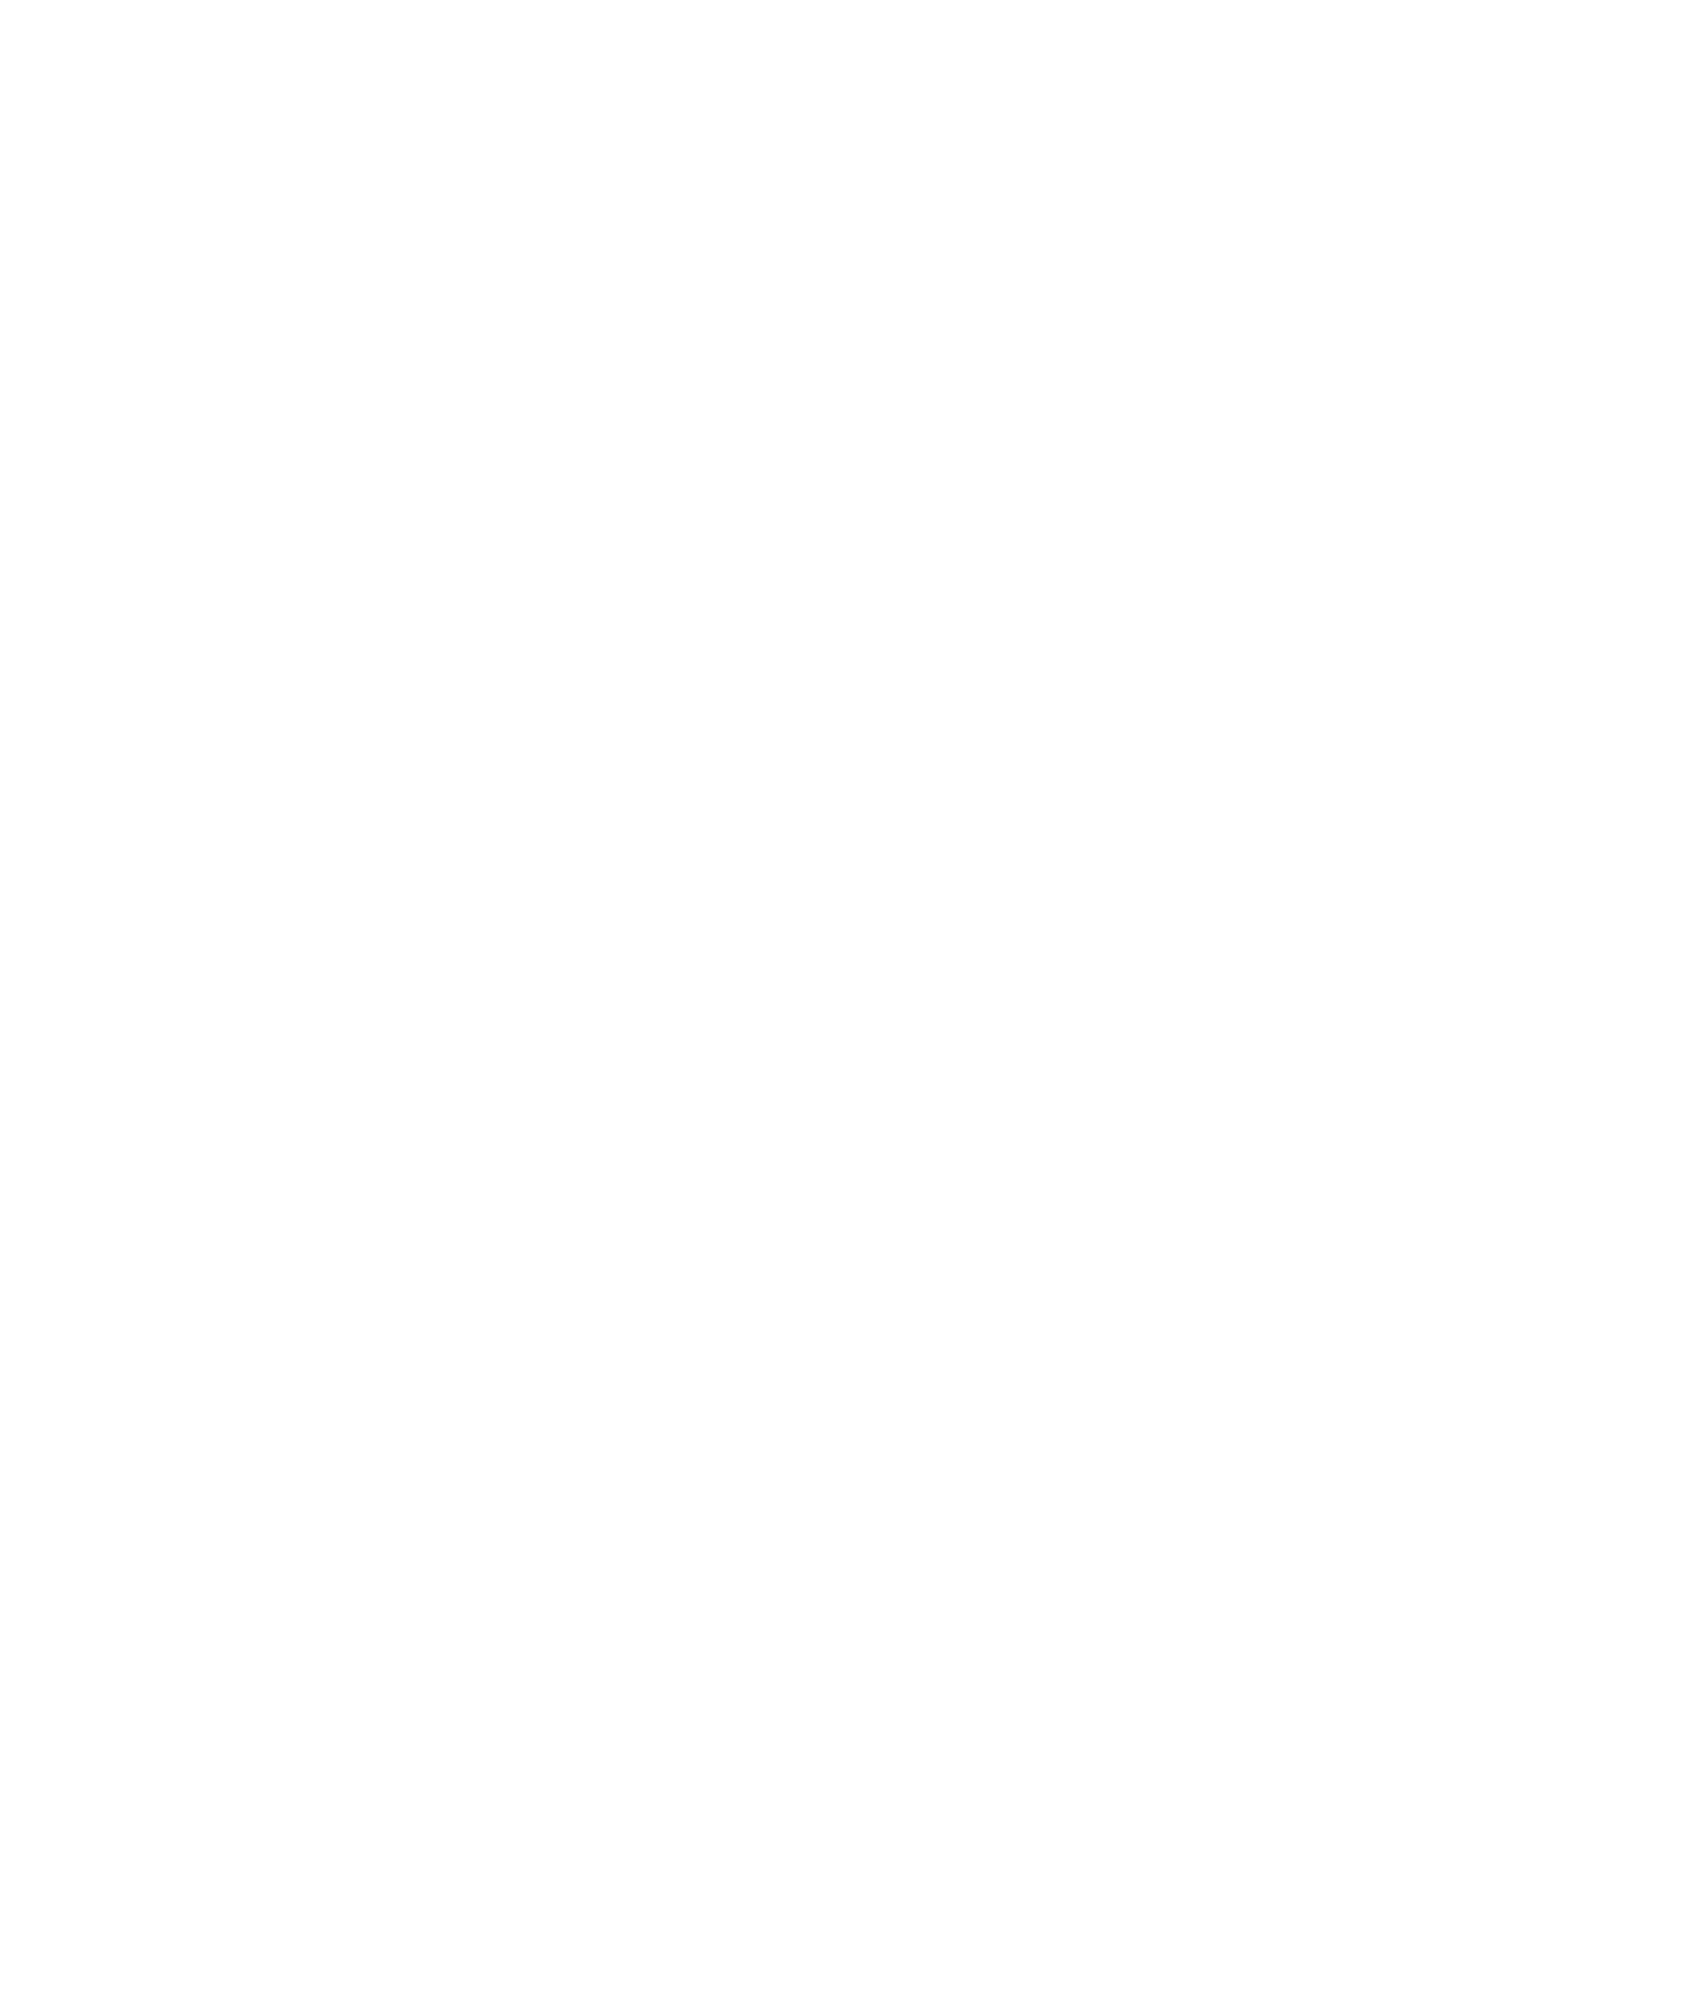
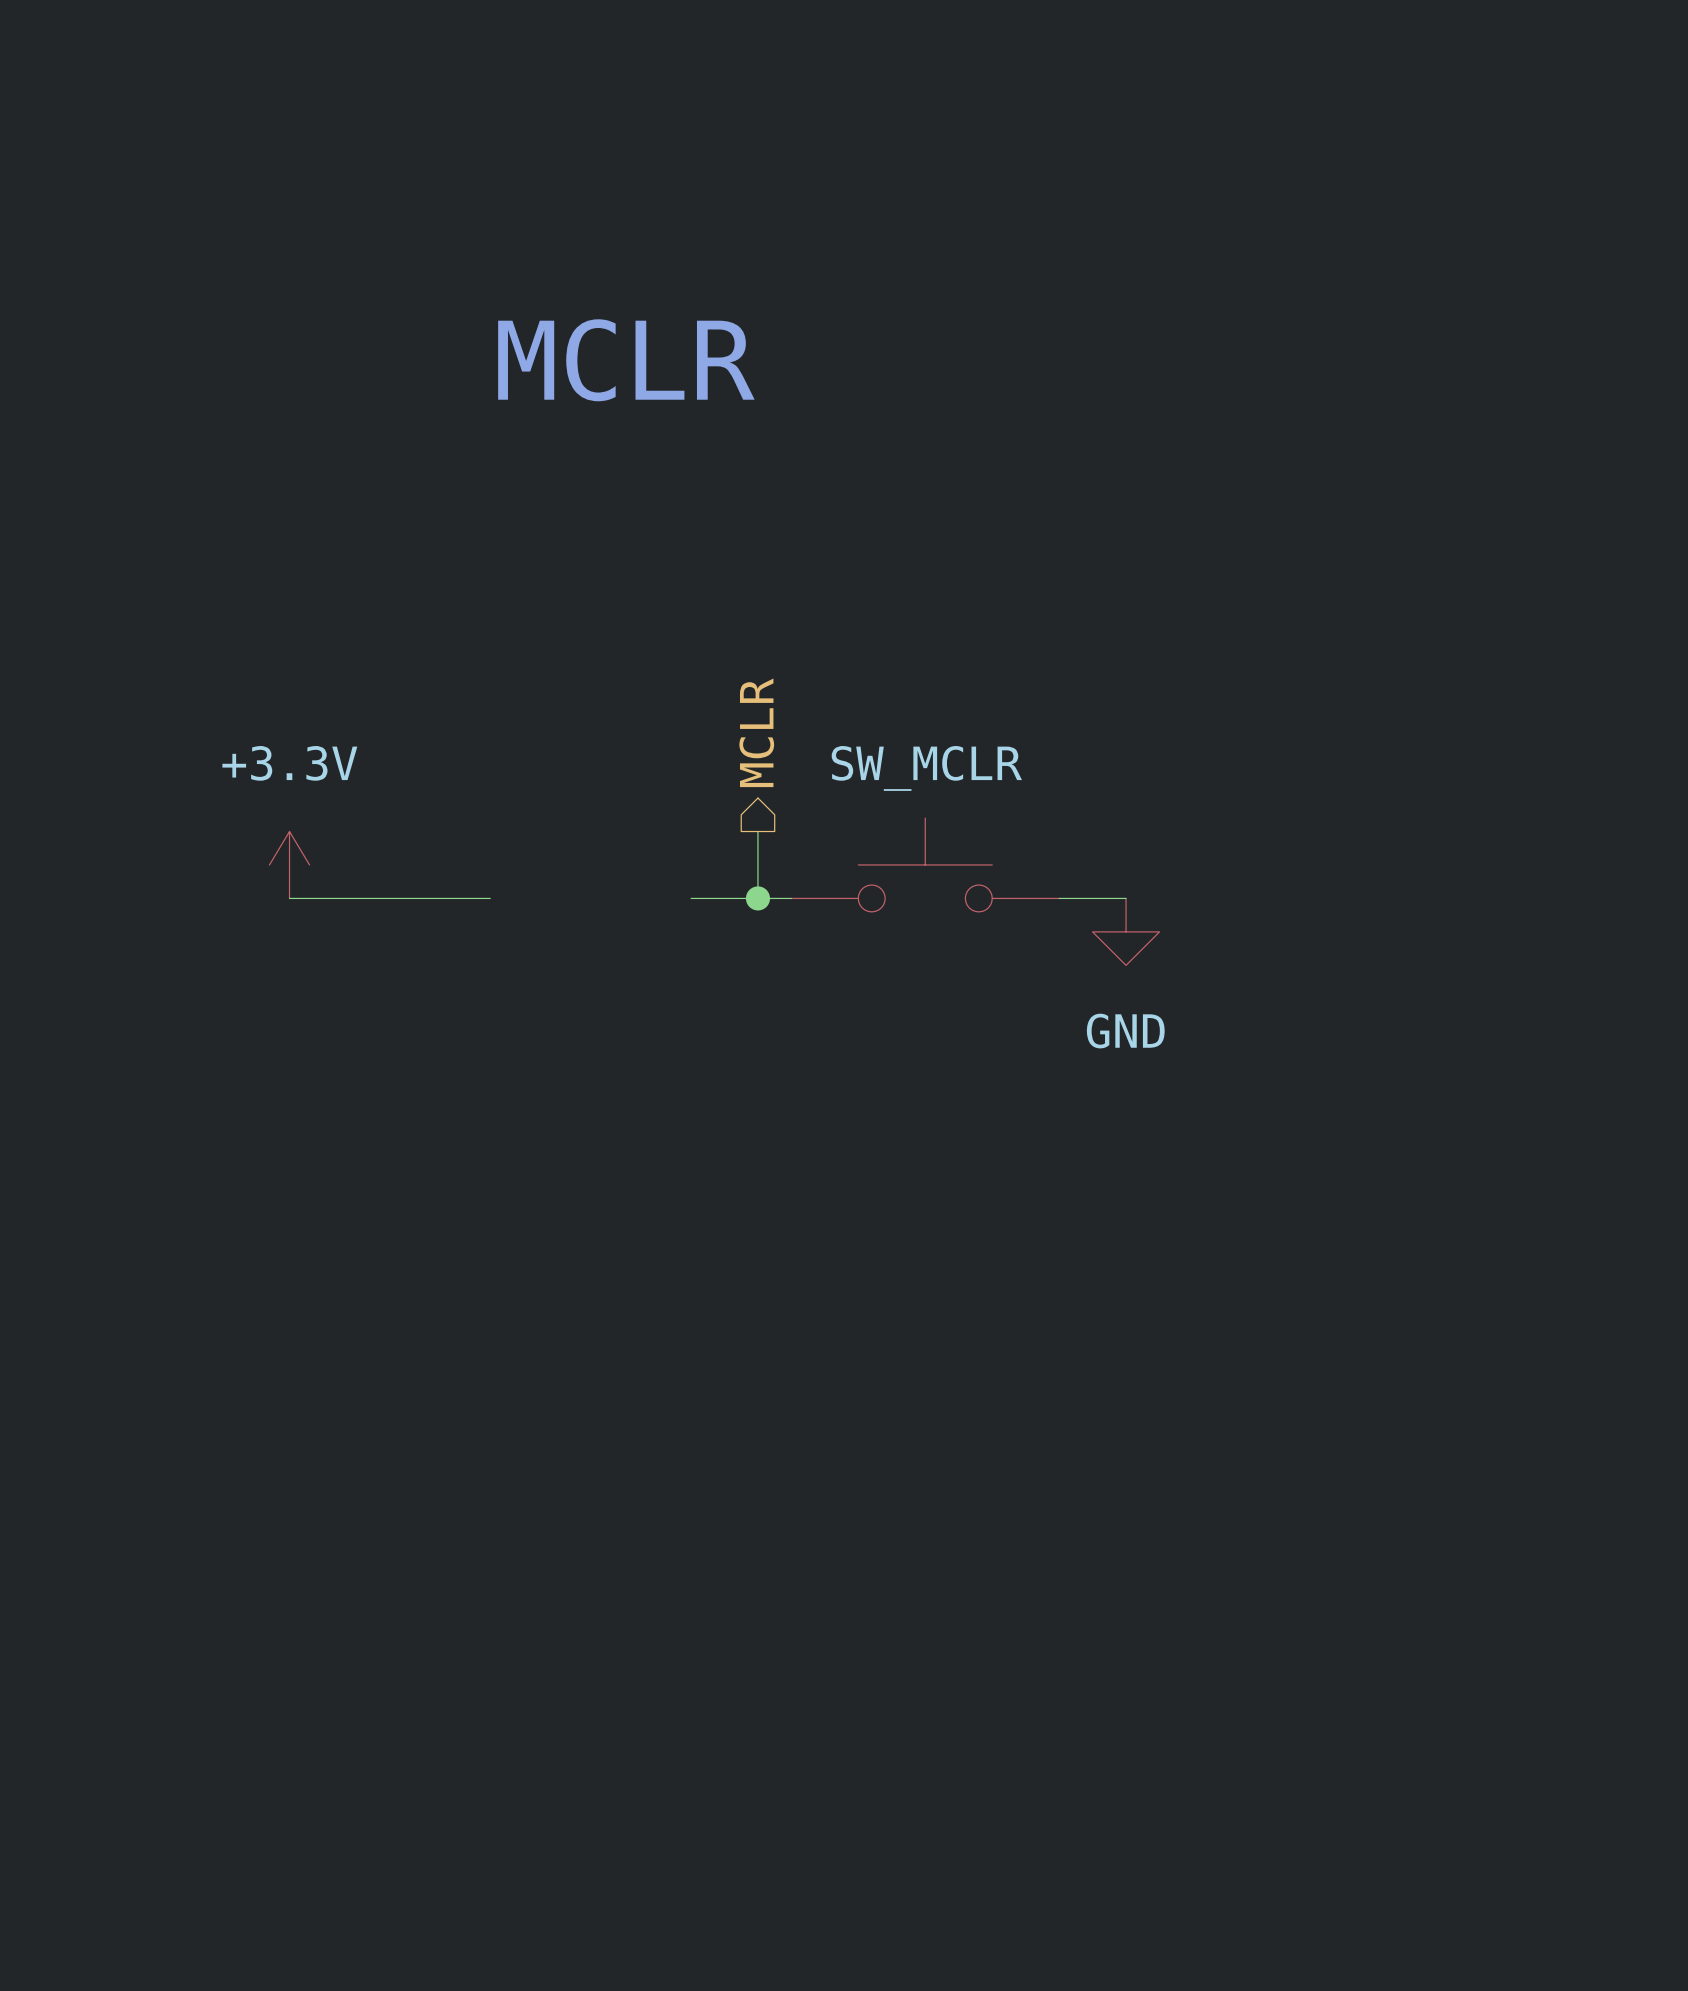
text: none -> MCLR (626, 360)
hierarchical label: none -> MCLR (756, 732)
wire: none -> (757, 831) (757, 898)
power symbol: none -> +3.3V (289, 864)
part: none -> SW_MCLR (925, 864)
wire: none -> (289, 898) (490, 898)
wire: none -> (691, 898) (791, 898)
junction: none -> (757, 898)
wire: none -> (1059, 898) (1126, 898)
power symbol: none -> GND (1126, 931)

